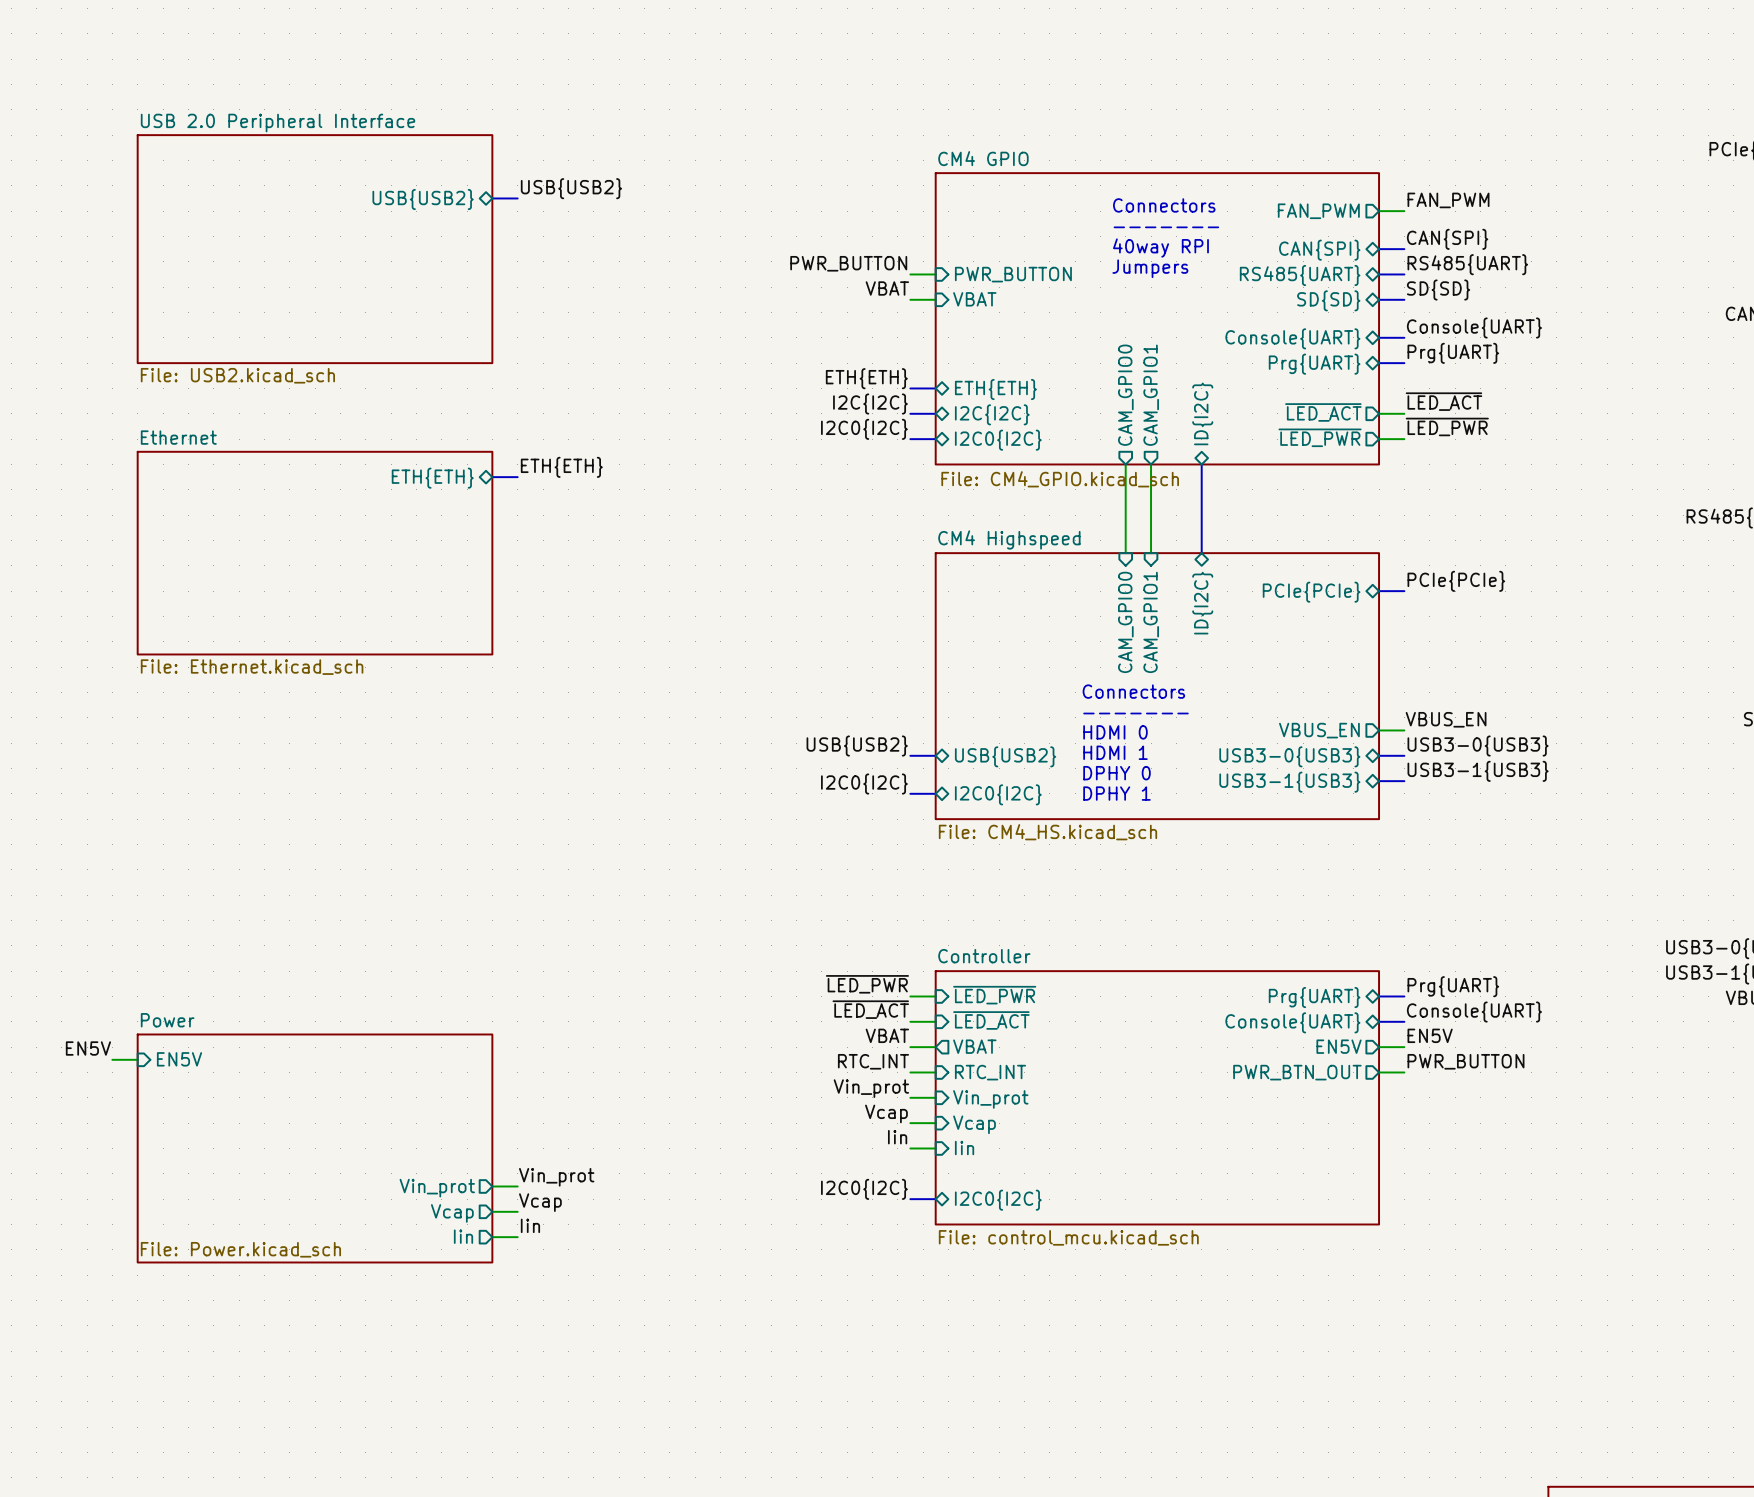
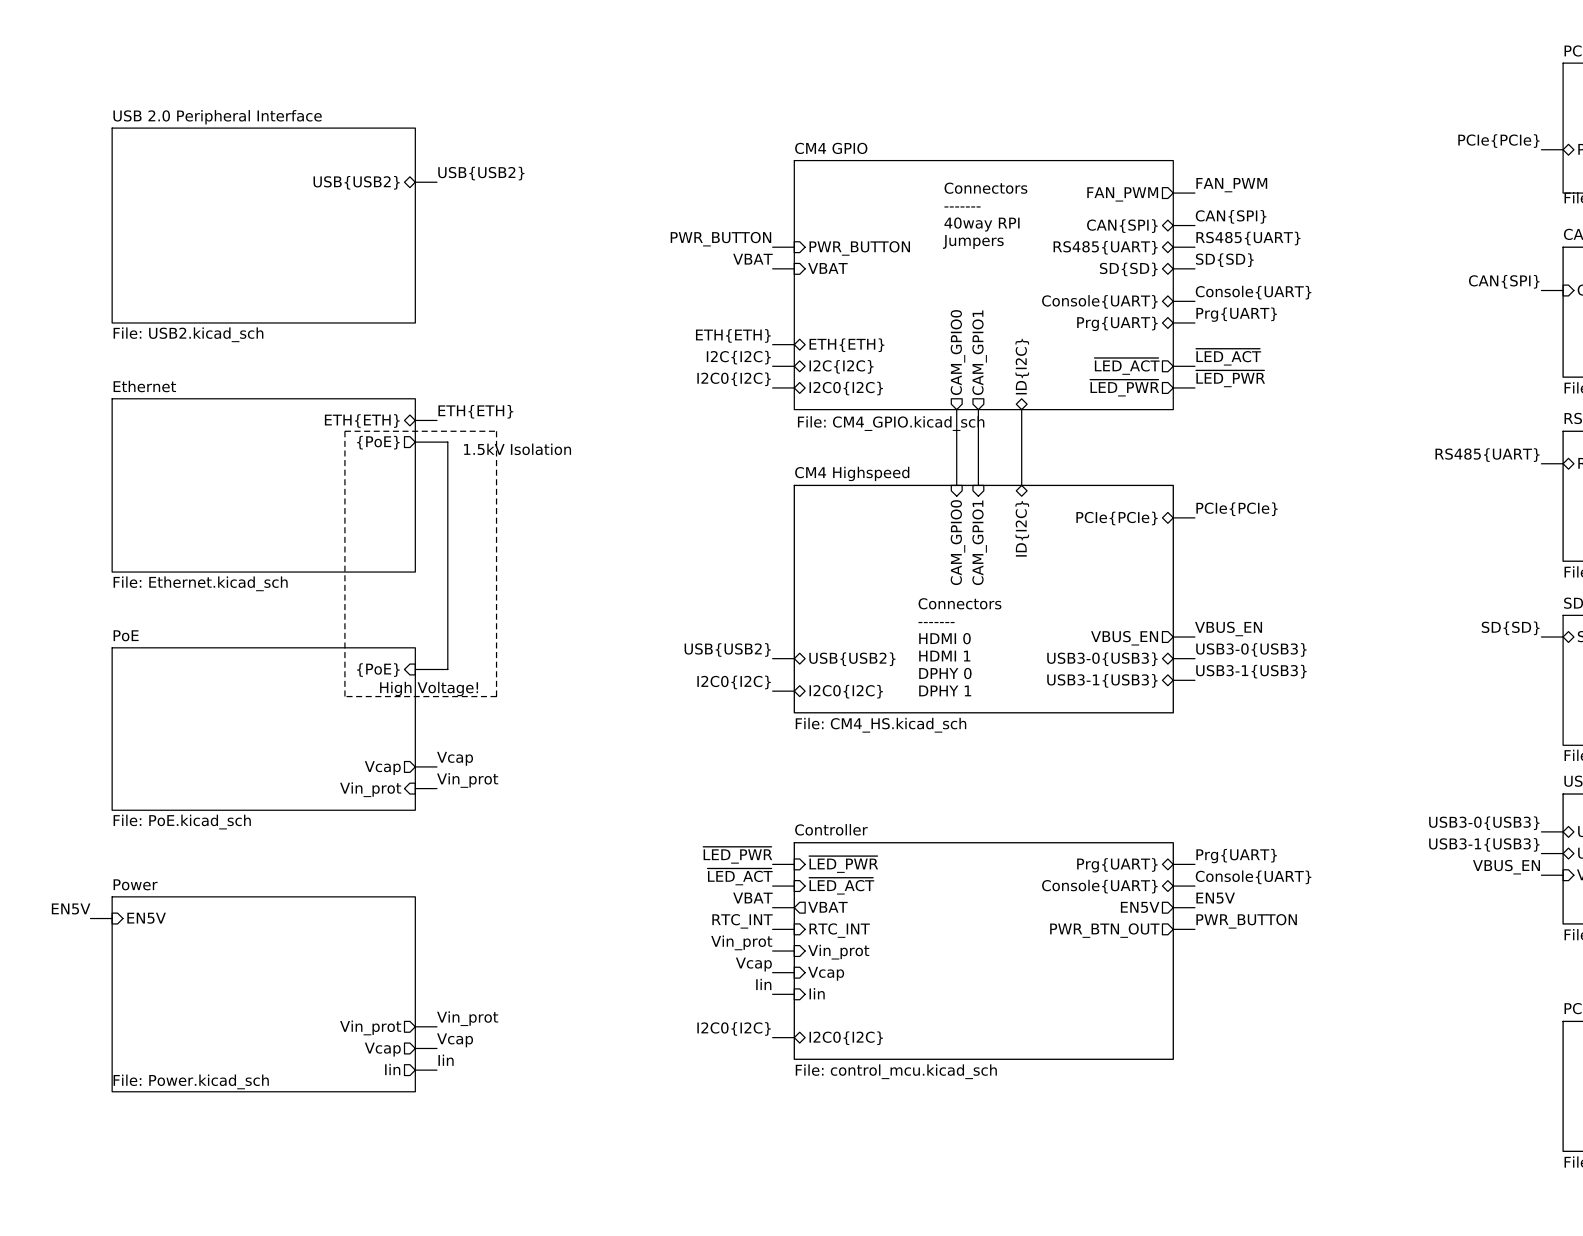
line: none -> (344, 431) (344, 696) (496, 696) (496, 431) (344, 431)
bus: none -> (415, 442) (447, 442) (447, 669) (415, 669)
sheet pin: none -> {PoE} (378, 442)
text: none -> 1.5kV Isolation (517, 449)
sheet pin: none -> {PoE} (378, 670)
text: none -> High Voltage! (429, 689)
sheet PoE: none -> File: PoE.kicad_sch (263, 729)
label: none -> Vcap (455, 758)
wire: none -> (415, 766) (436, 766)
sheet pin: none -> Vcap (382, 768)
label: none -> Vin_prot (467, 780)
wire: none -> (415, 788) (436, 788)
sheet pin: none -> Vin_prot (370, 789)

